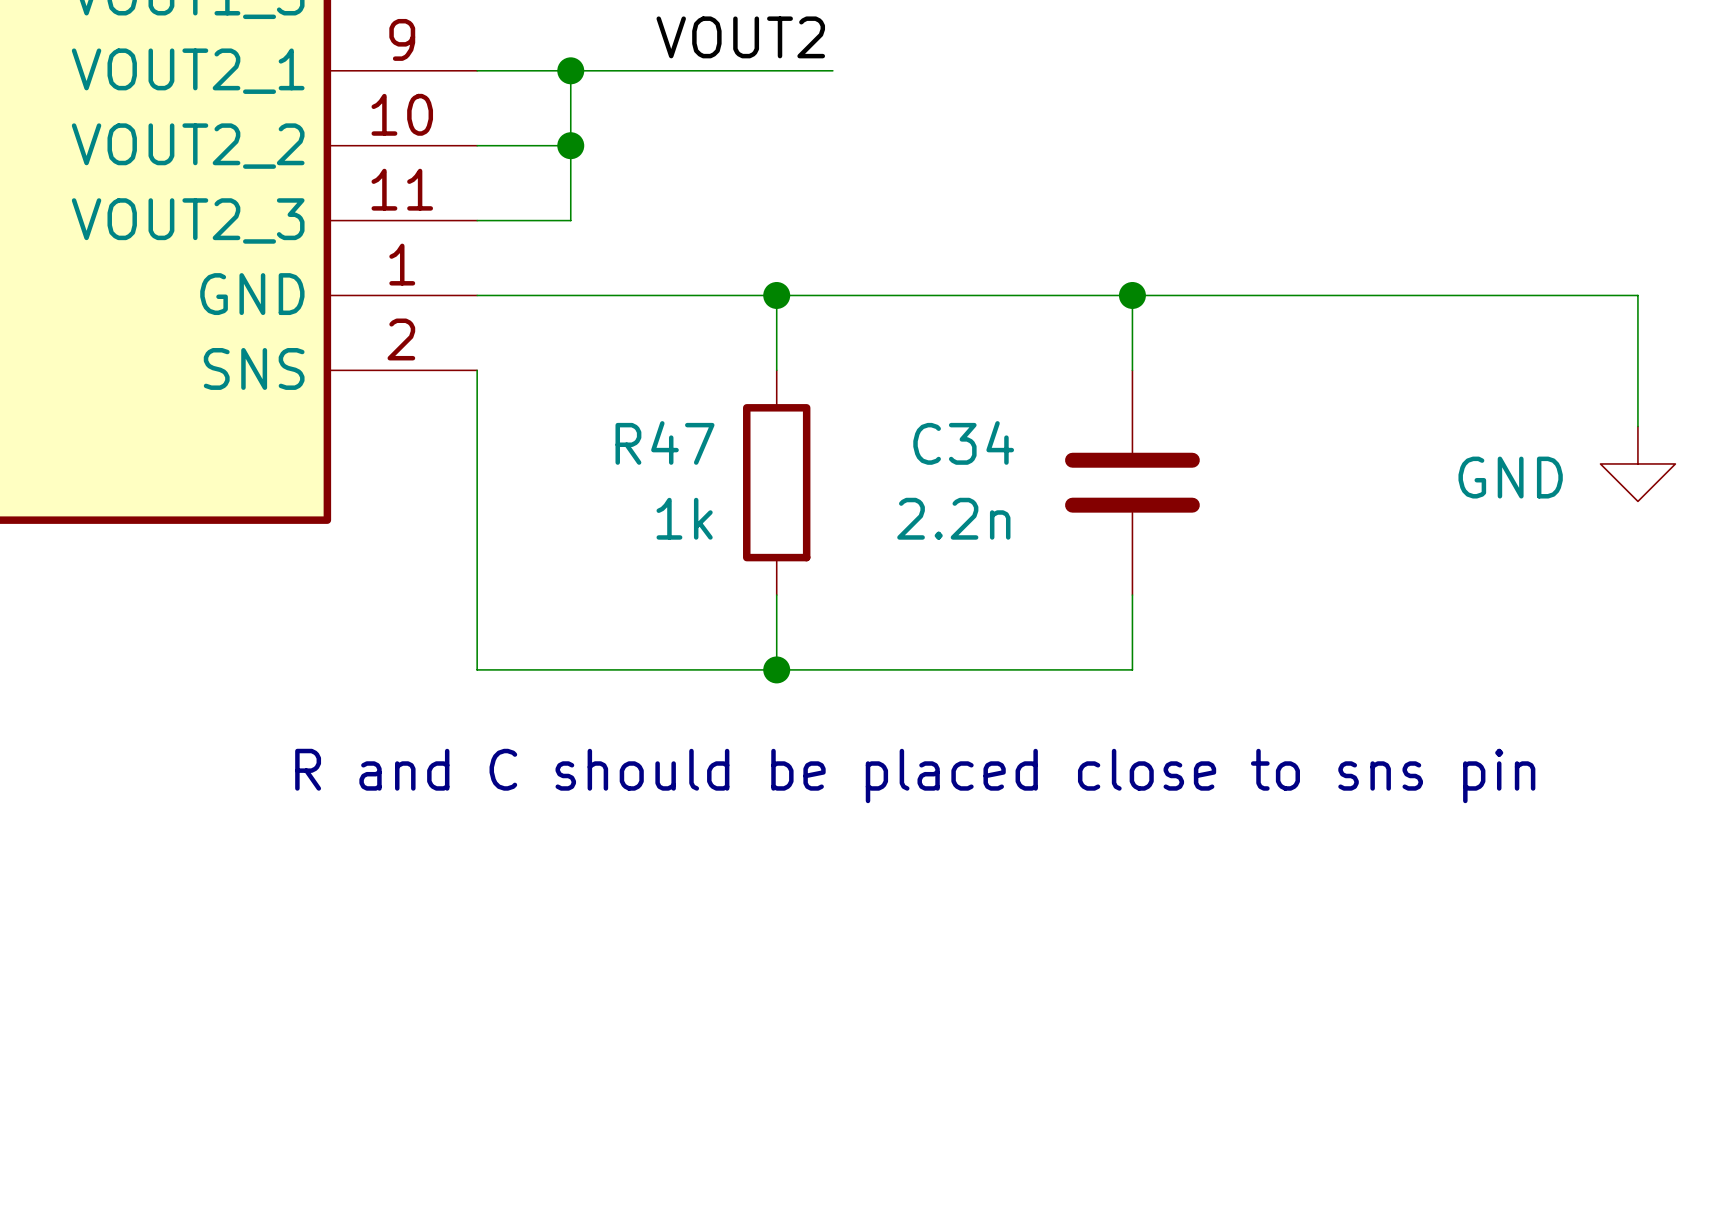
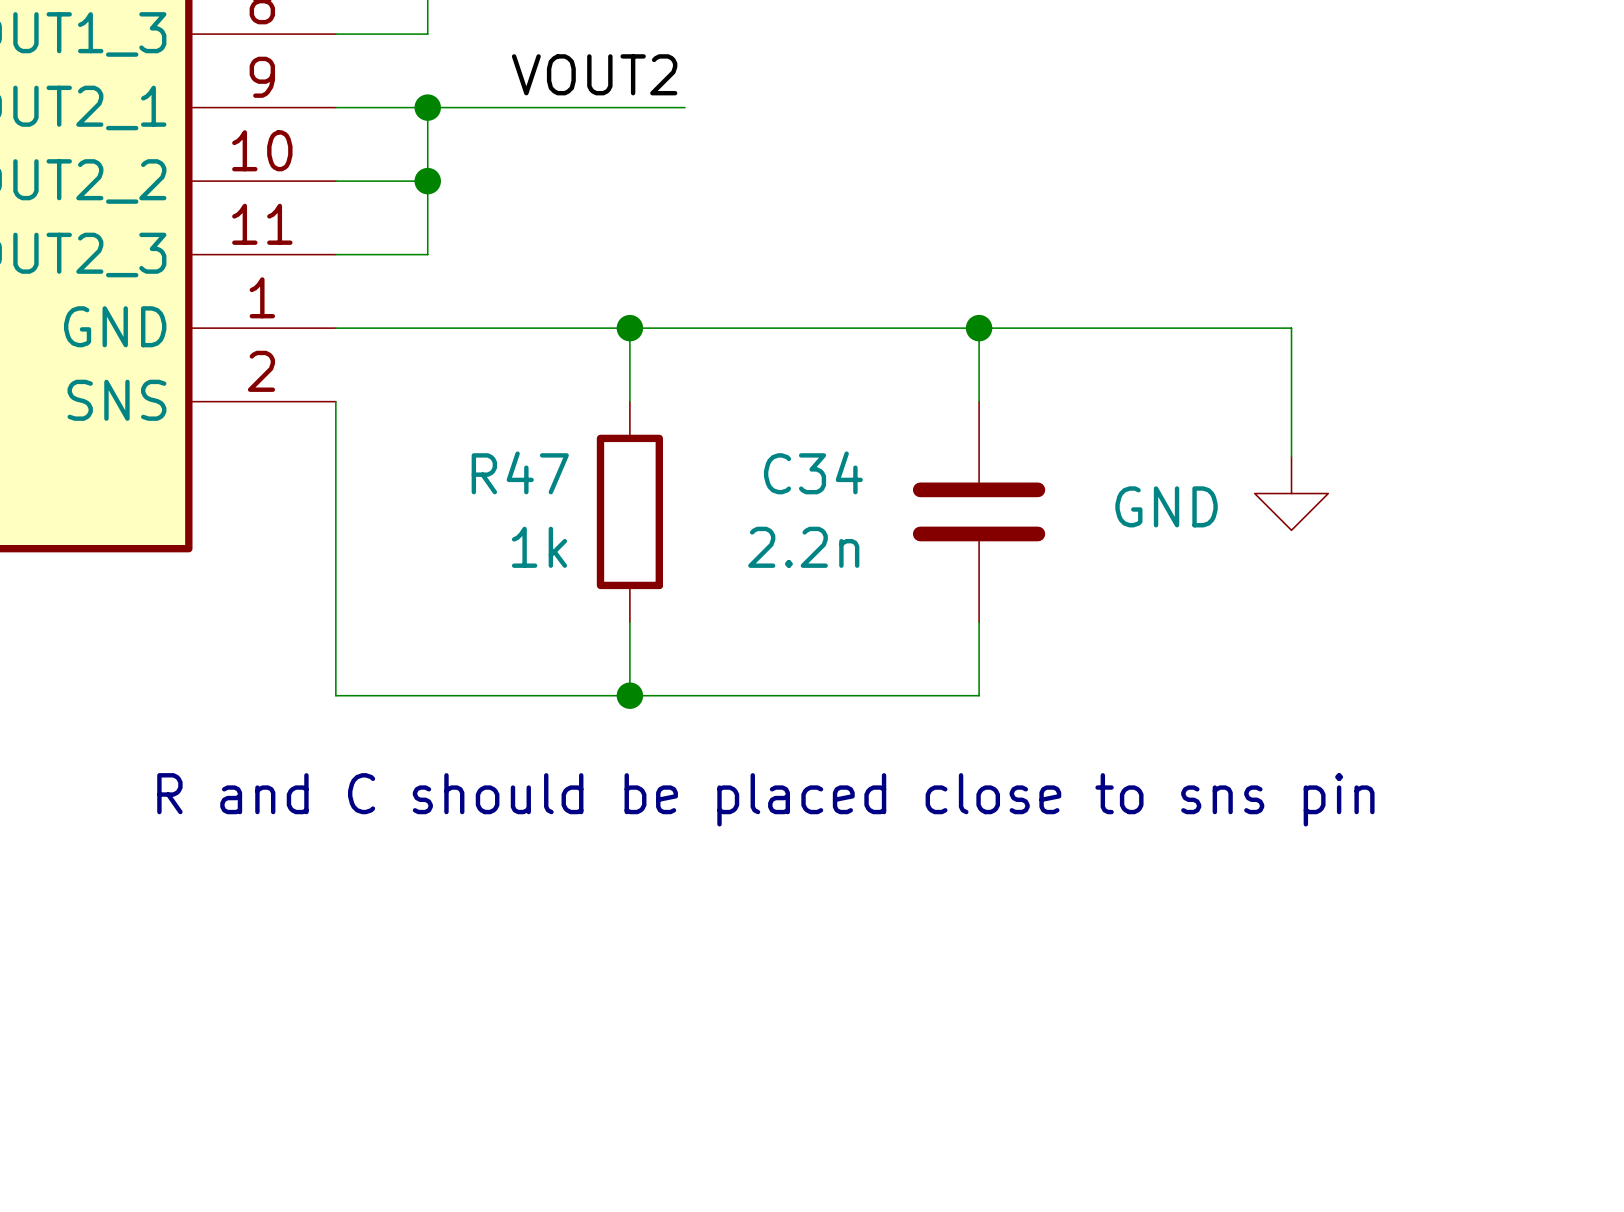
wire: (1450, 295) (1637, 295) (1637, 426) -> (1291, 328) (1291, 456)
power symbol position: GND (1637, 463) -> GND (1291, 493)

